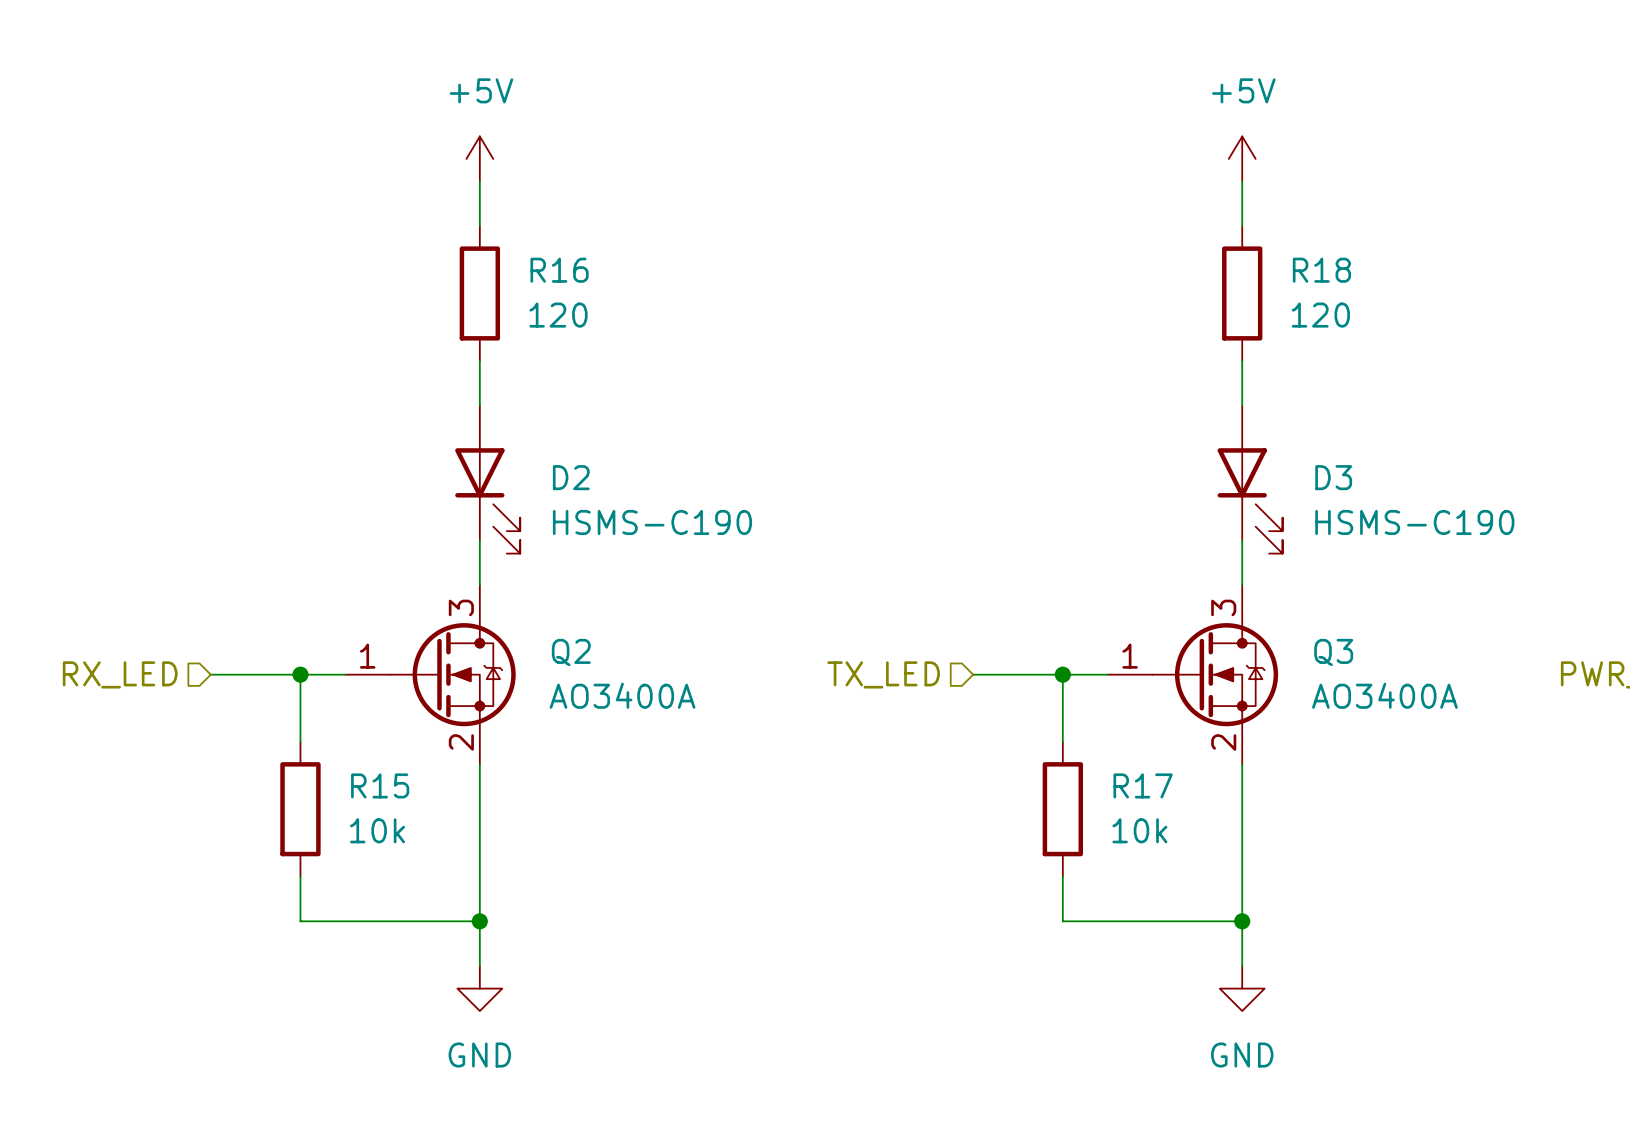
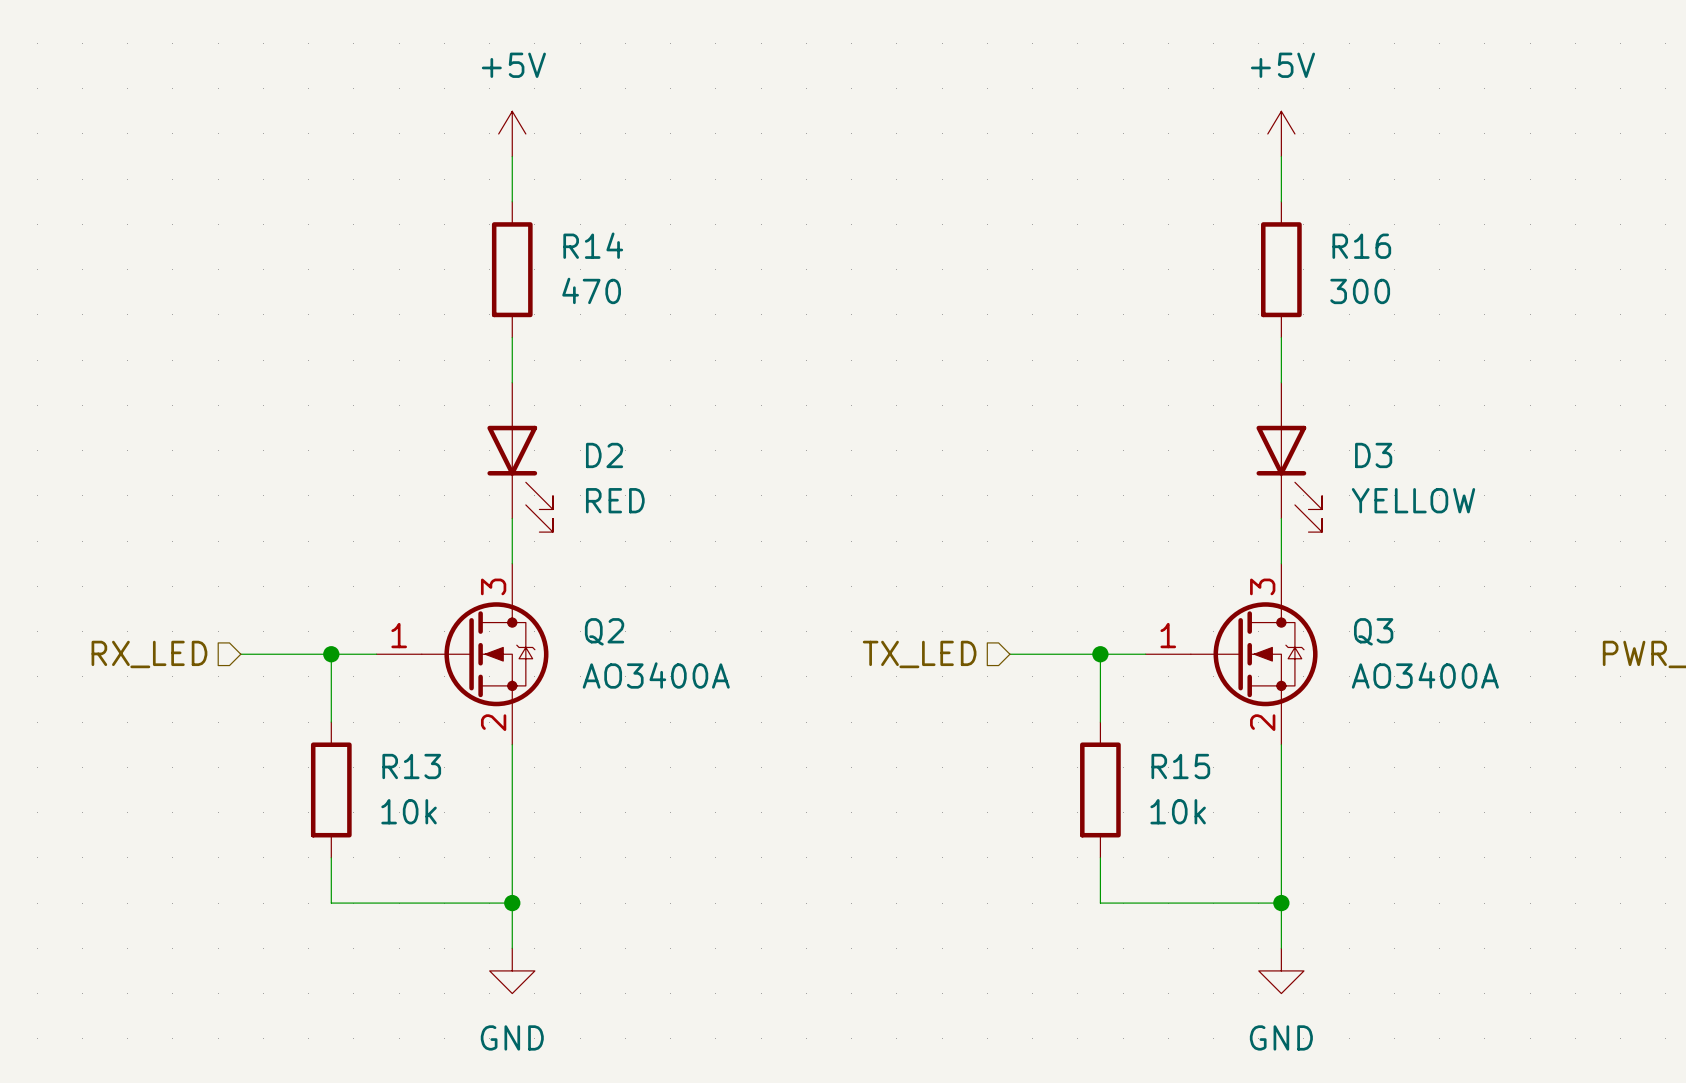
R16 name: R16 (559, 270) -> R14 (593, 245)
R18 name: R18 (1321, 270) -> R16 (1361, 246)
R16 value: 120 (558, 315) -> 470 (591, 290)
R18 value: 120 (1320, 315) -> 300 (1360, 291)
D2 value: HSMS-C190 (652, 522) -> RED (615, 500)
D3 value: HSMS-C190 (1414, 522) -> YELLOW (1413, 500)
R15 name: R15 (380, 785) -> R13 (411, 766)
R17 name: R17 (1143, 785) -> R15 (1180, 766)

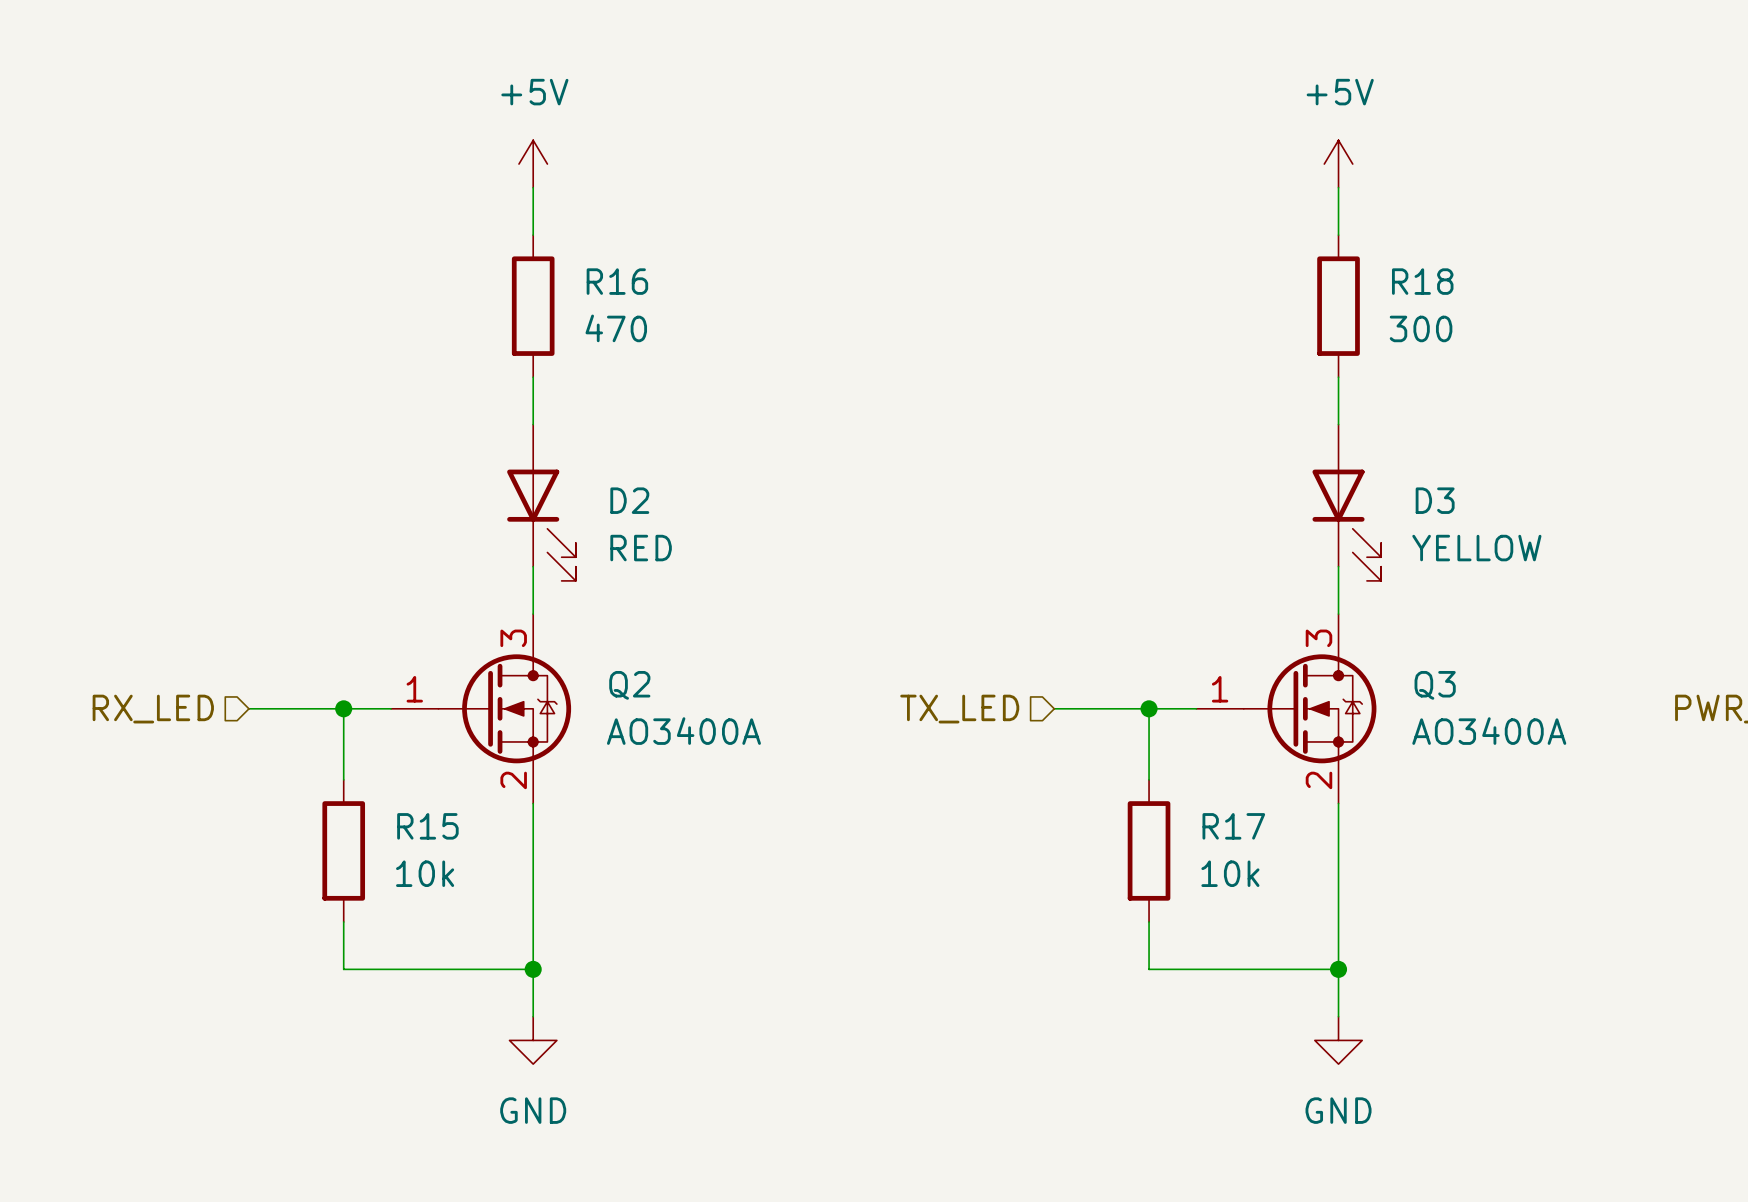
R14 name: R14 (593, 245) -> R16 (617, 281)
R16 name: R16 (1361, 246) -> R18 (1422, 281)
R13 name: R13 (411, 766) -> R15 (427, 826)
R15 name: R15 (1180, 766) -> R17 (1233, 826)

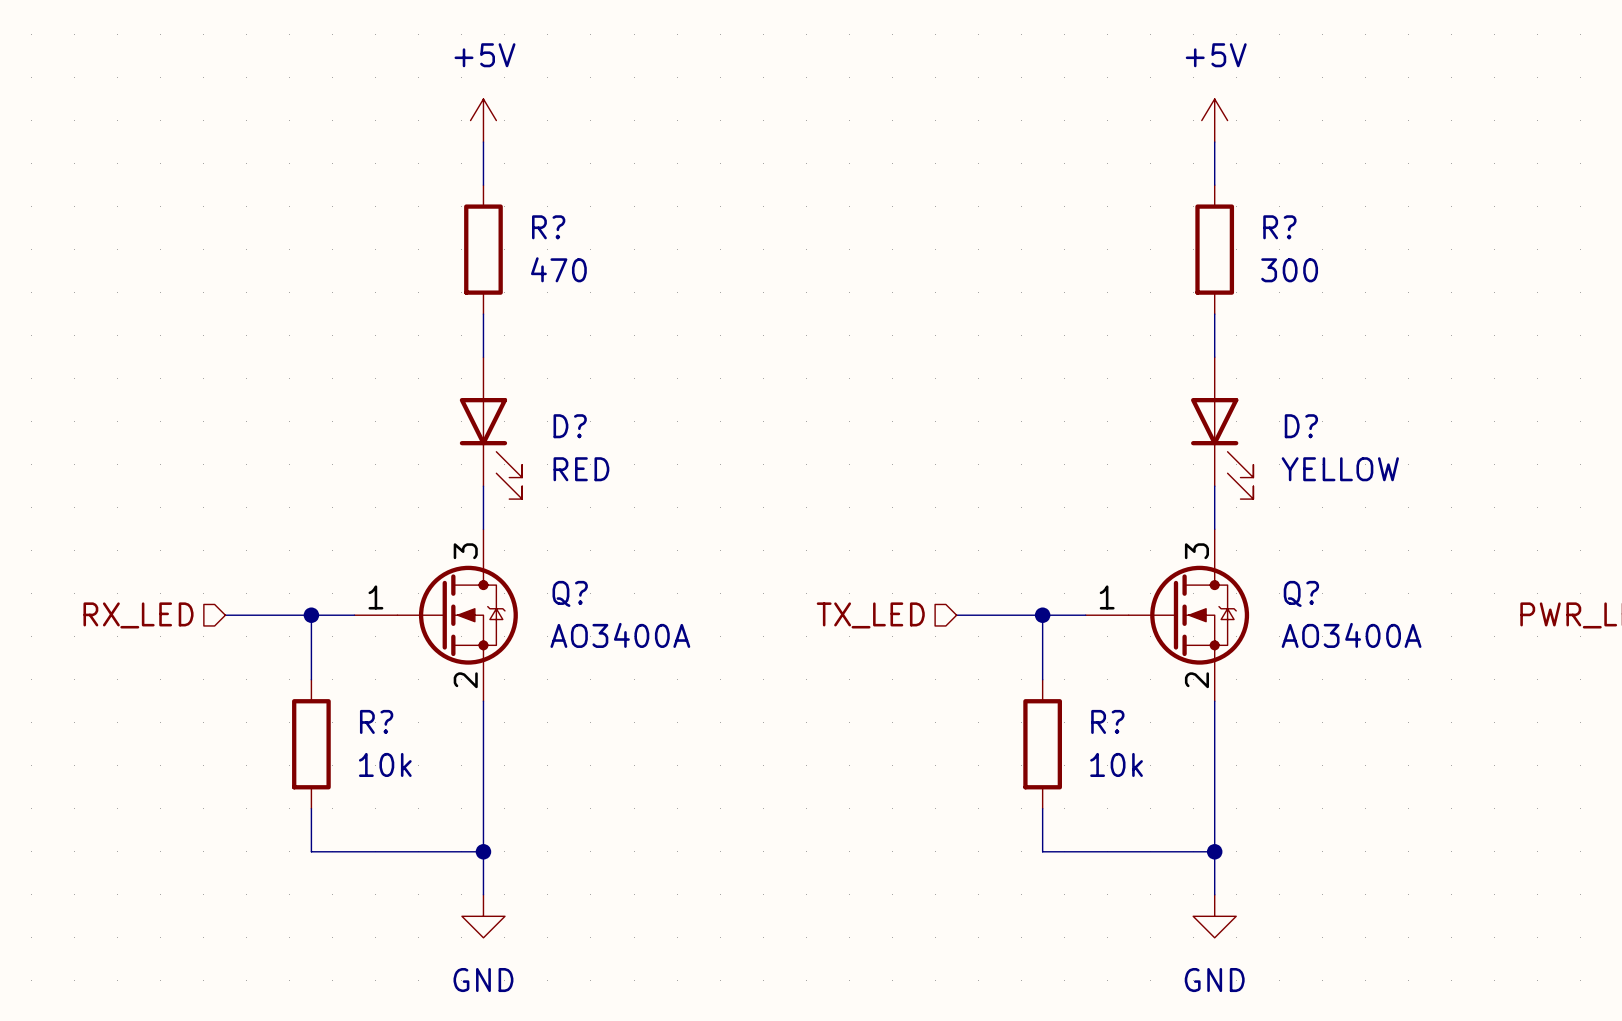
R16 name: R16 (617, 281) -> R? (548, 227)
R18 name: R18 (1422, 281) -> R? (1279, 227)
D2 name: D2 (629, 500) -> D? (570, 426)
D3 name: D3 (1435, 500) -> D? (1301, 426)
Q2 name: Q2 (629, 685) -> Q? (570, 593)
Q3 name: Q3 (1435, 685) -> Q? (1301, 593)
R15 name: R15 (427, 826) -> R? (376, 721)
R17 name: R17 (1233, 826) -> R? (1107, 721)

